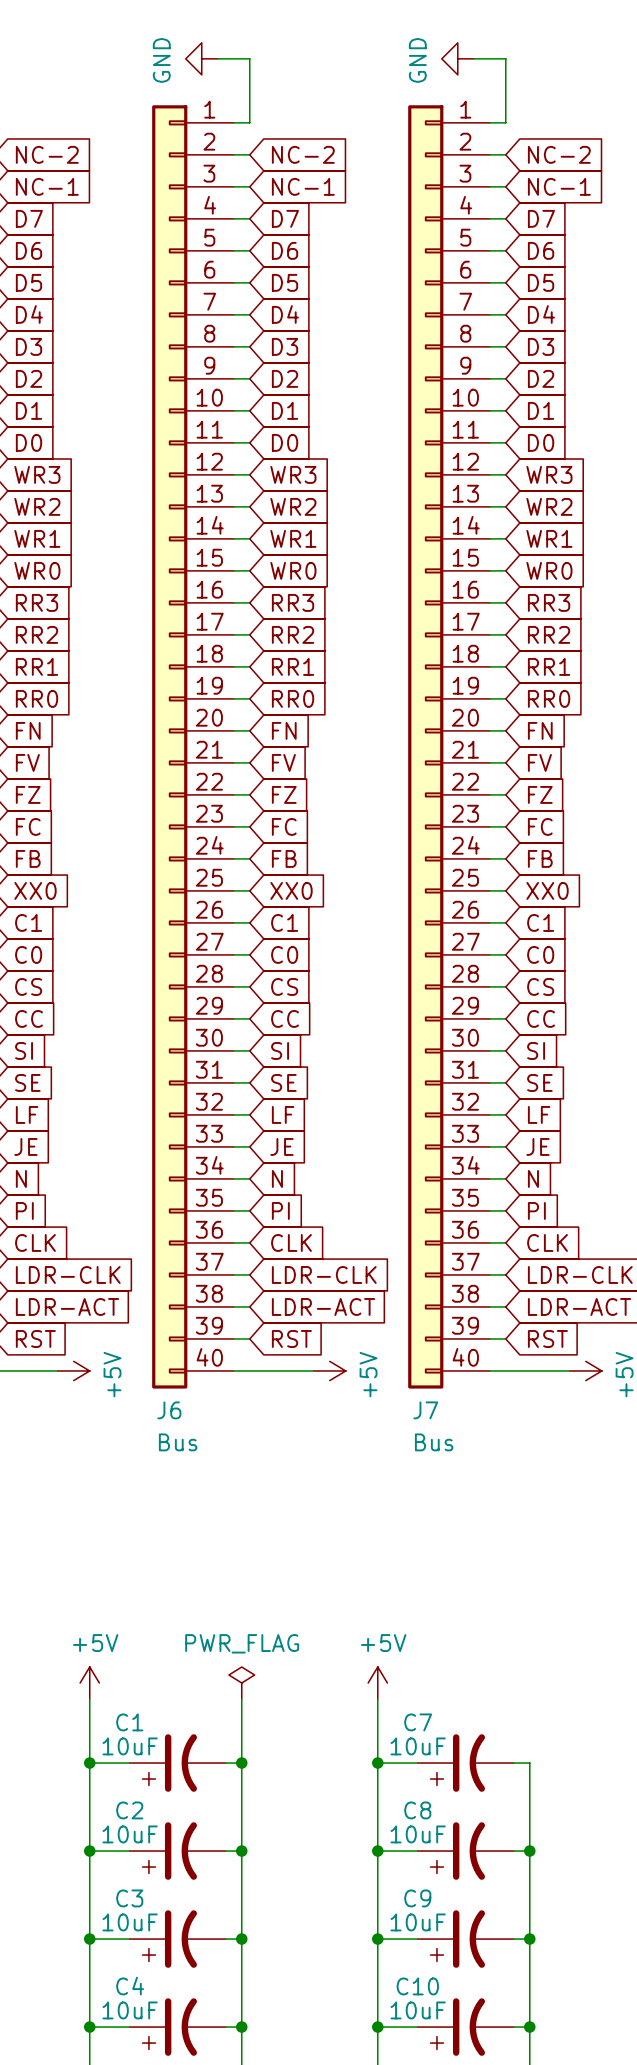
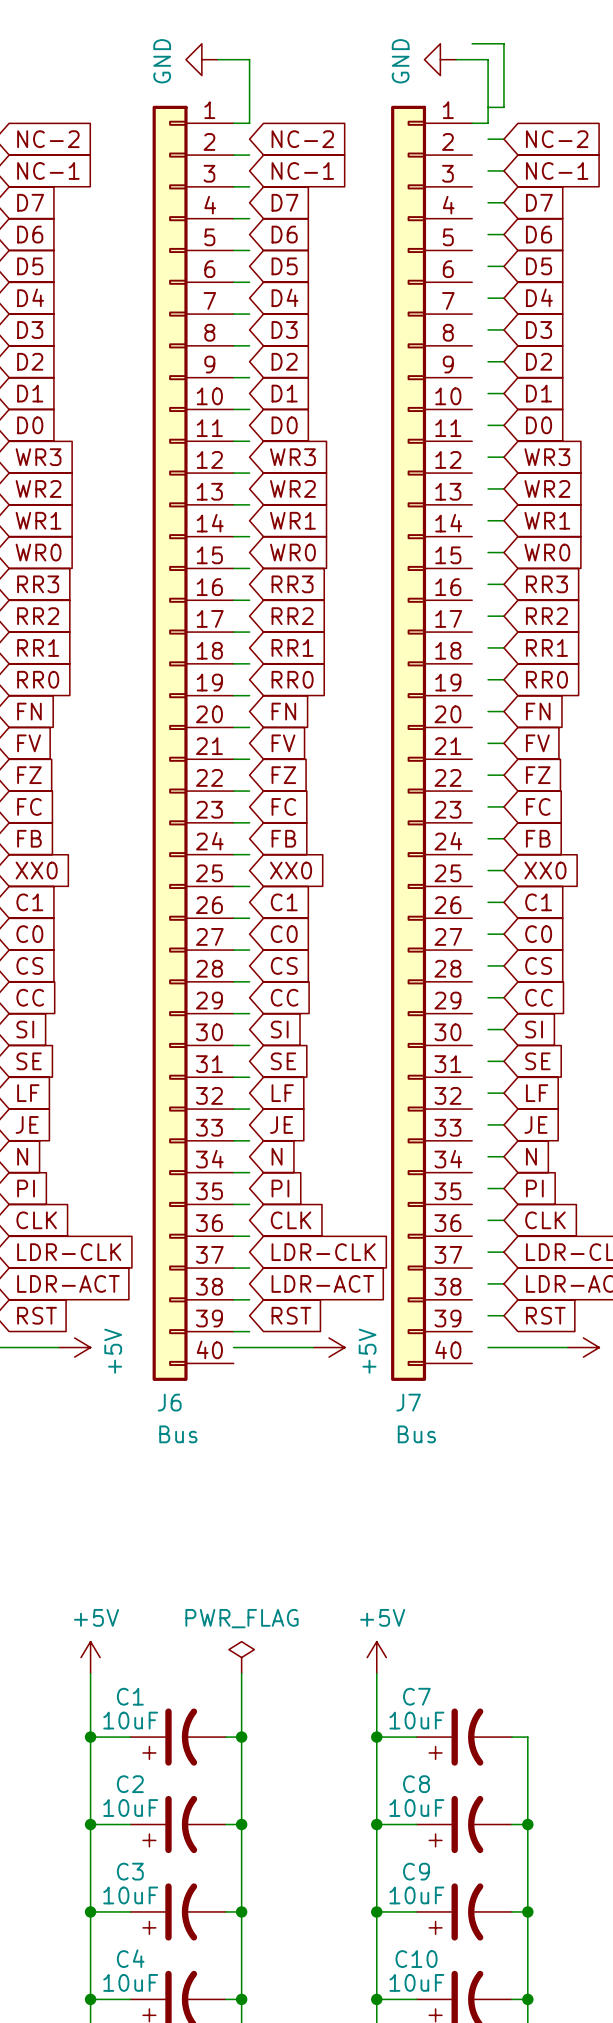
power symbol position: GND (201, 58) -> GND (201, 59)
wire: (217, 58) (249, 58) (249, 74) -> (217, 59) (249, 59)
power symbol position: GND (457, 58) -> GND (440, 59)
wire: none -> (456, 59) (488, 59) (488, 123) (472, 123)
wire: (233, 122) (249, 122) -> (233, 123) (249, 123) (249, 107)
wire: (233, 154) (249, 154) -> (233, 155) (249, 155)
wire: (233, 186) (249, 186) -> (233, 186) (249, 186)
wire: (233, 218) (249, 218) -> (233, 218) (249, 218)
wire: (233, 250) (249, 250) -> (233, 250) (249, 250)
wire: (233, 282) (249, 282) -> (233, 282) (249, 282)
wire: (233, 314) (249, 314) -> (233, 314) (249, 314)
wire: (233, 346) (249, 346) -> (233, 345) (249, 345)
wire: (233, 378) (249, 378) -> (233, 377) (249, 377)
wire: (233, 410) (249, 410) -> (233, 409) (249, 409)
wire: (233, 442) (249, 442) -> (233, 441) (249, 441)
wire: (233, 474) (249, 474) -> (233, 473) (249, 473)
wire: (233, 506) (249, 506) -> (233, 504) (249, 504)
wire: (233, 538) (249, 538) -> (233, 536) (249, 536)
wire: (233, 570) (249, 570) -> (233, 568) (249, 568)
wire: (233, 602) (249, 602) -> (233, 600) (249, 600)
wire: (233, 634) (249, 634) -> (233, 632) (249, 632)
wire: (233, 666) (249, 666) -> (233, 663) (249, 663)
wire: (233, 698) (249, 698) -> (233, 695) (249, 695)
wire: (233, 730) (249, 730) -> (233, 727) (249, 727)
J6 position: (192, 746) -> (193, 743)
J7 position: (448, 746) -> (431, 743)
wire: (233, 762) (249, 762) -> (233, 759) (249, 759)
wire: (233, 794) (249, 794) -> (233, 791) (249, 791)
wire: (233, 826) (249, 826) -> (233, 822) (249, 822)
wire: (233, 858) (249, 858) -> (233, 854) (249, 854)
wire: (233, 890) (249, 890) -> (233, 886) (249, 886)
wire: (233, 922) (249, 922) -> (233, 918) (249, 918)
wire: (233, 954) (249, 954) -> (233, 950) (249, 950)
wire: (233, 986) (249, 986) -> (233, 981) (249, 981)
wire: (233, 1018) (249, 1018) -> (233, 1013) (249, 1013)
wire: (233, 1050) (249, 1050) -> (233, 1045) (249, 1045)
wire: (233, 1082) (249, 1082) -> (233, 1077) (249, 1077)
wire: (233, 1114) (249, 1114) -> (233, 1109) (249, 1109)
wire: (233, 1146) (249, 1146) -> (233, 1140) (249, 1140)
wire: (233, 1178) (249, 1178) -> (233, 1172) (249, 1172)
wire: (233, 1210) (249, 1210) -> (233, 1204) (249, 1204)
wire: (233, 1242) (249, 1242) -> (233, 1236) (249, 1236)
wire: (233, 1274) (249, 1274) -> (233, 1268) (249, 1268)
wire: (233, 1306) (249, 1306) -> (233, 1299) (249, 1299)
wire: (233, 1338) (249, 1338) -> (233, 1331) (249, 1331)

